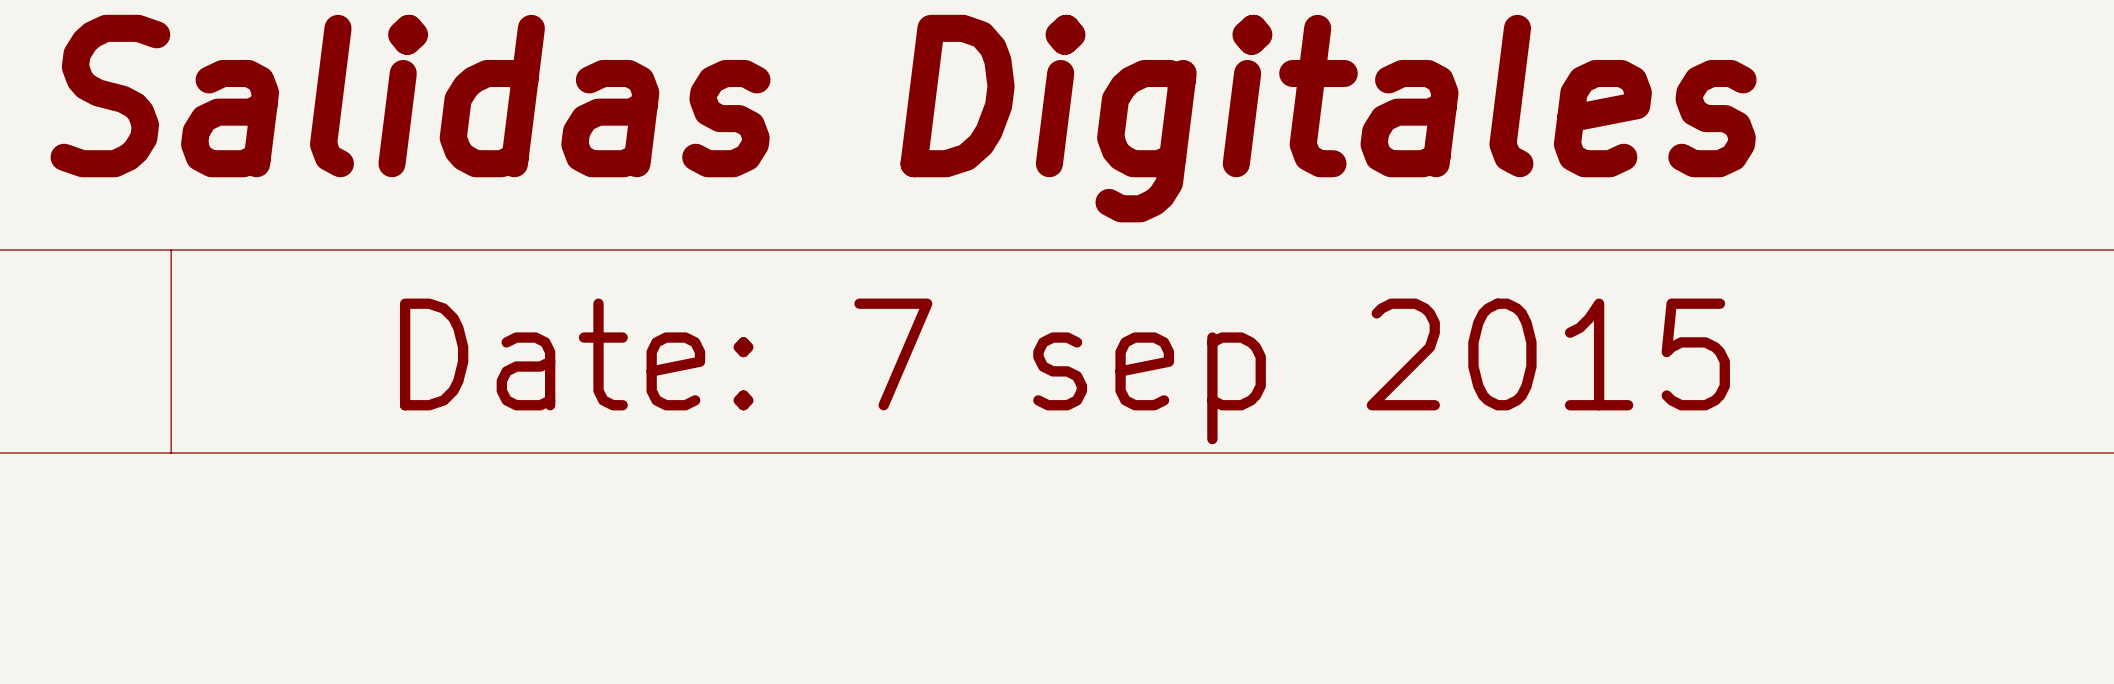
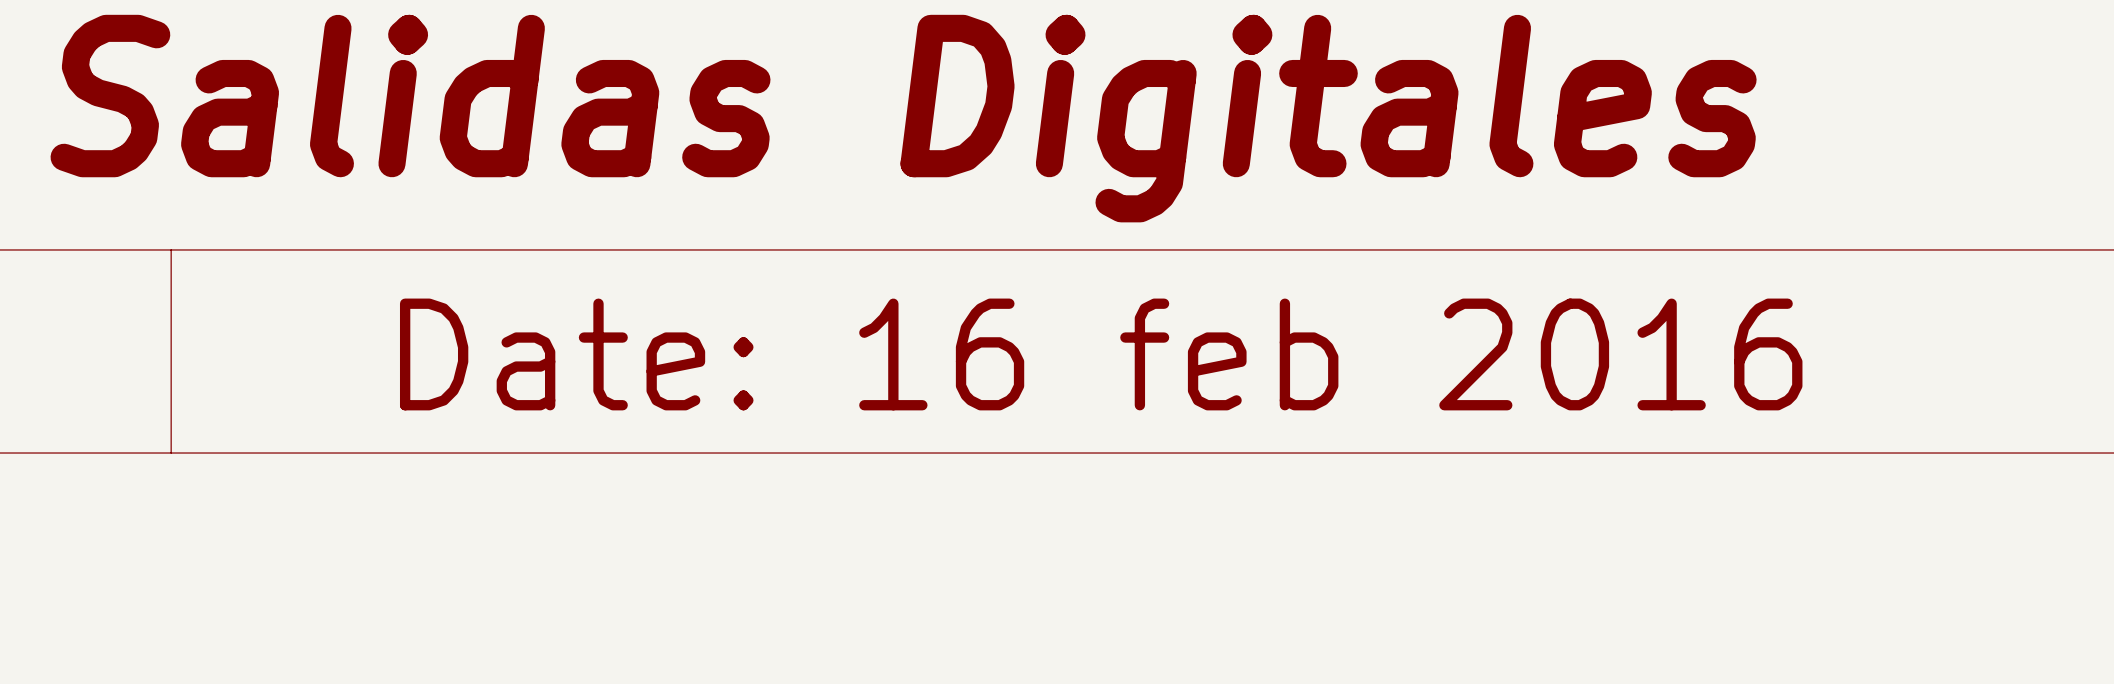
title block: Date: 7 sep 2015 (1064, 371) -> Date: 16 feb 2016 (1101, 354)

